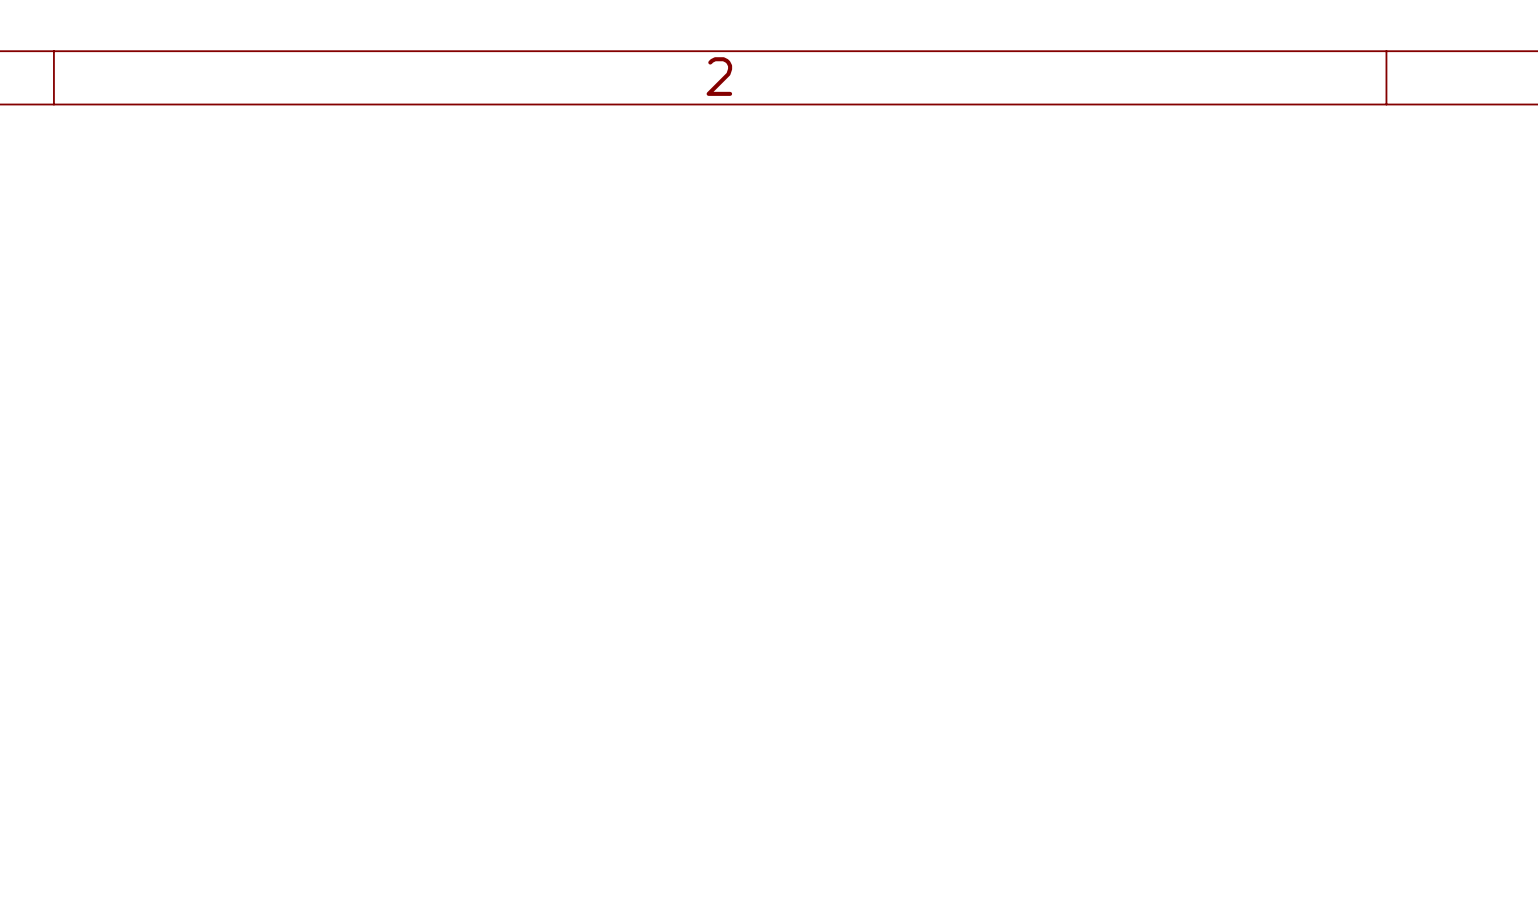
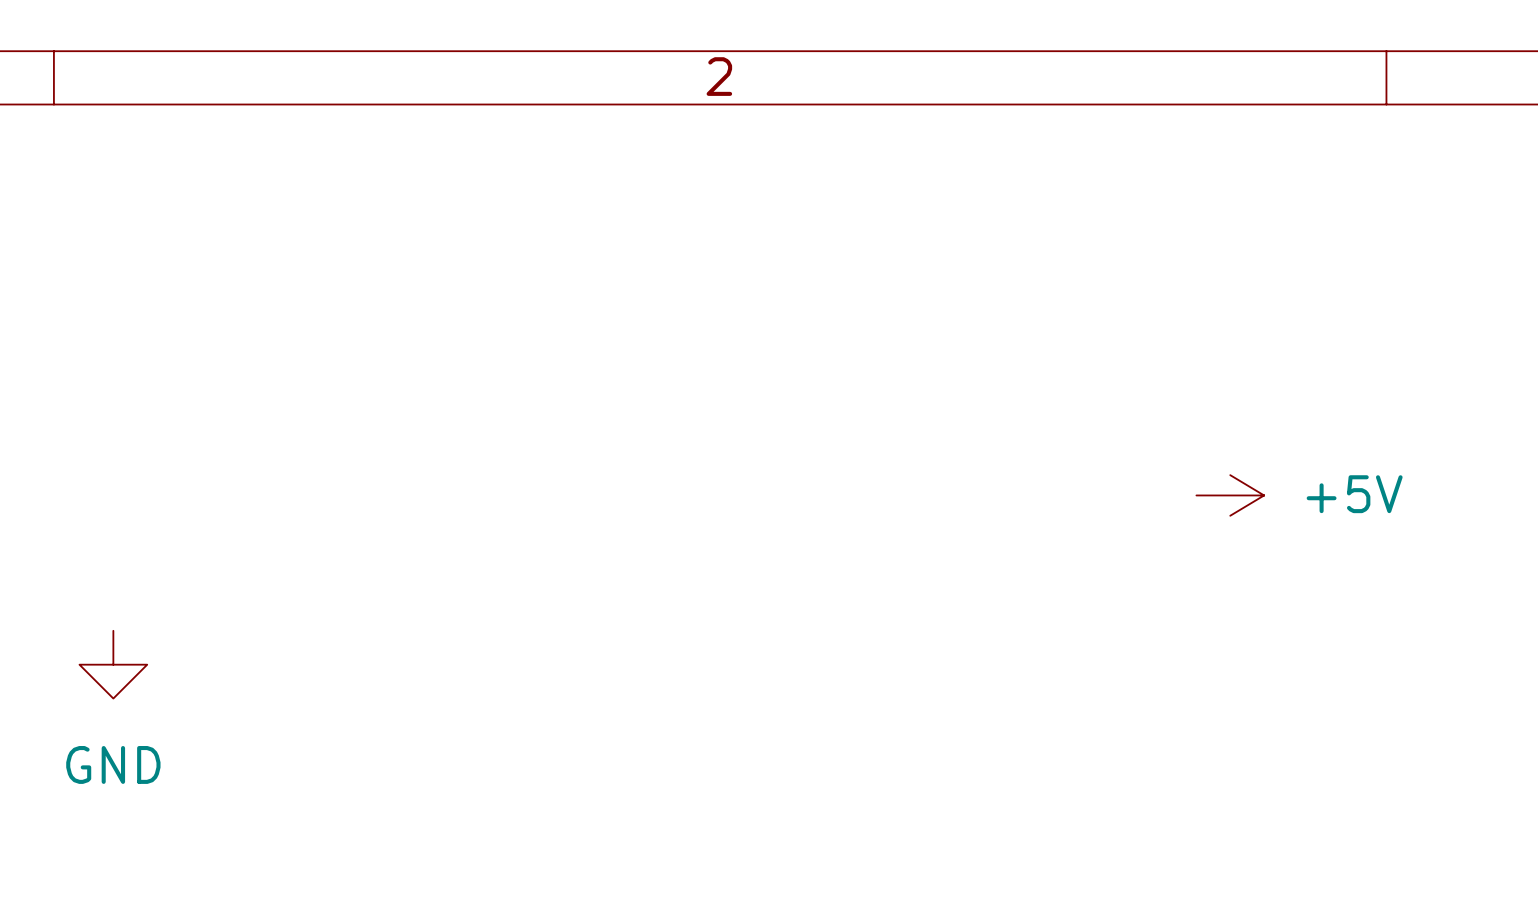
power symbol: none -> +5V (1230, 495)
power symbol: none -> GND (113, 664)

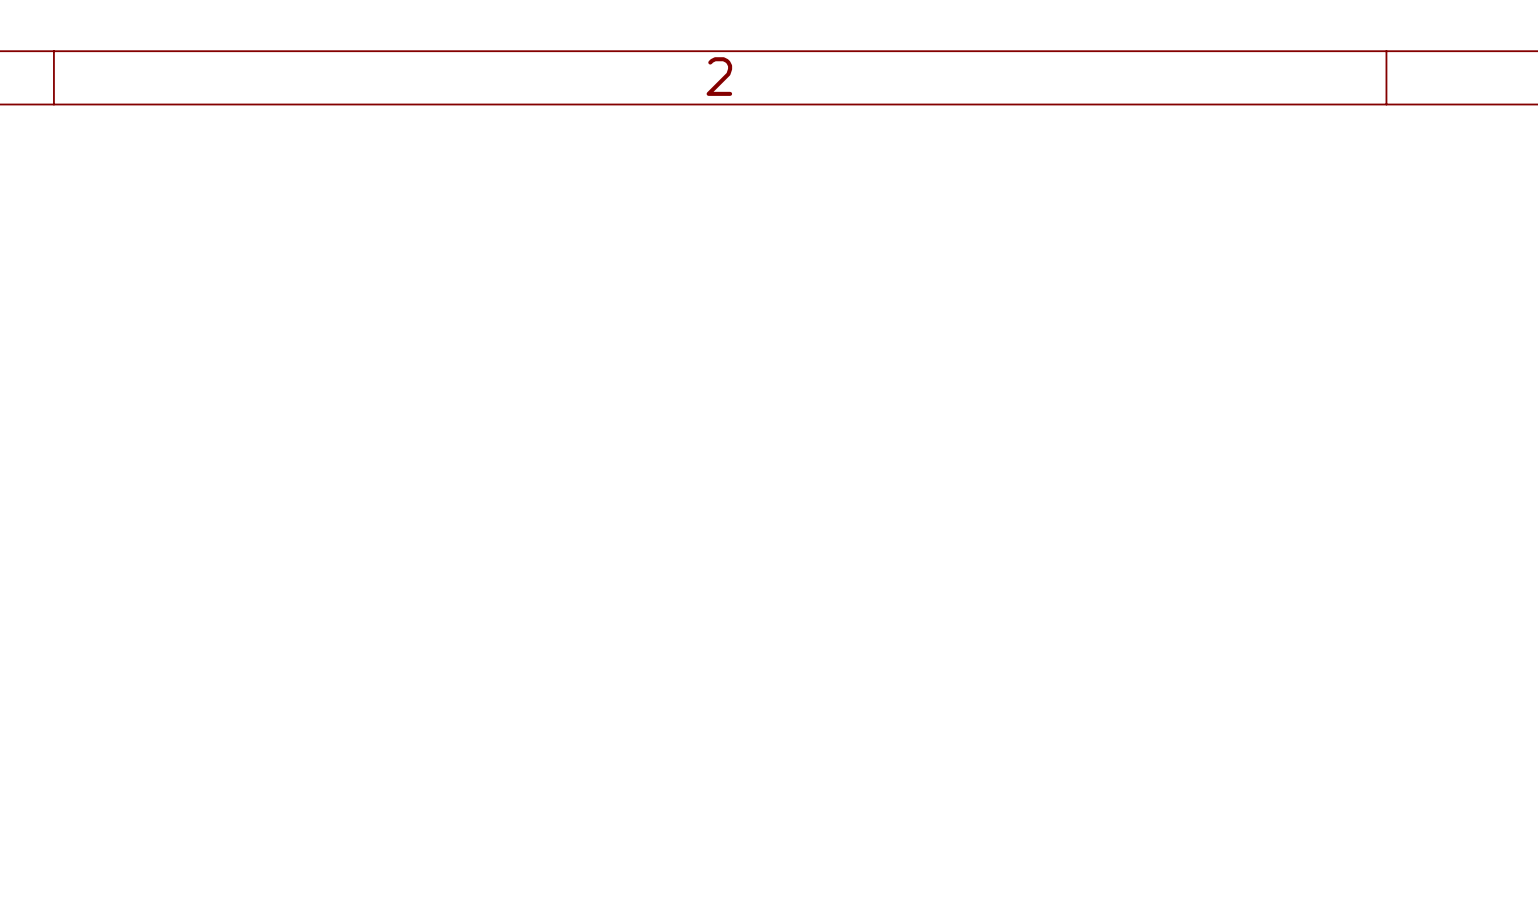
power symbol: +5V (1230, 495) -> none
power symbol: GND (113, 664) -> none

